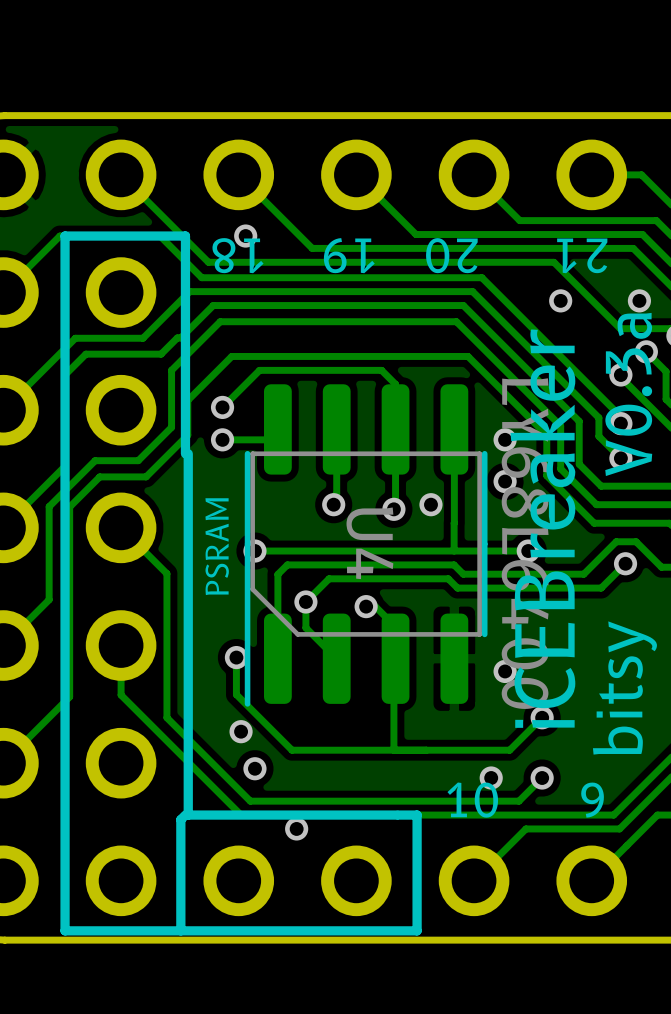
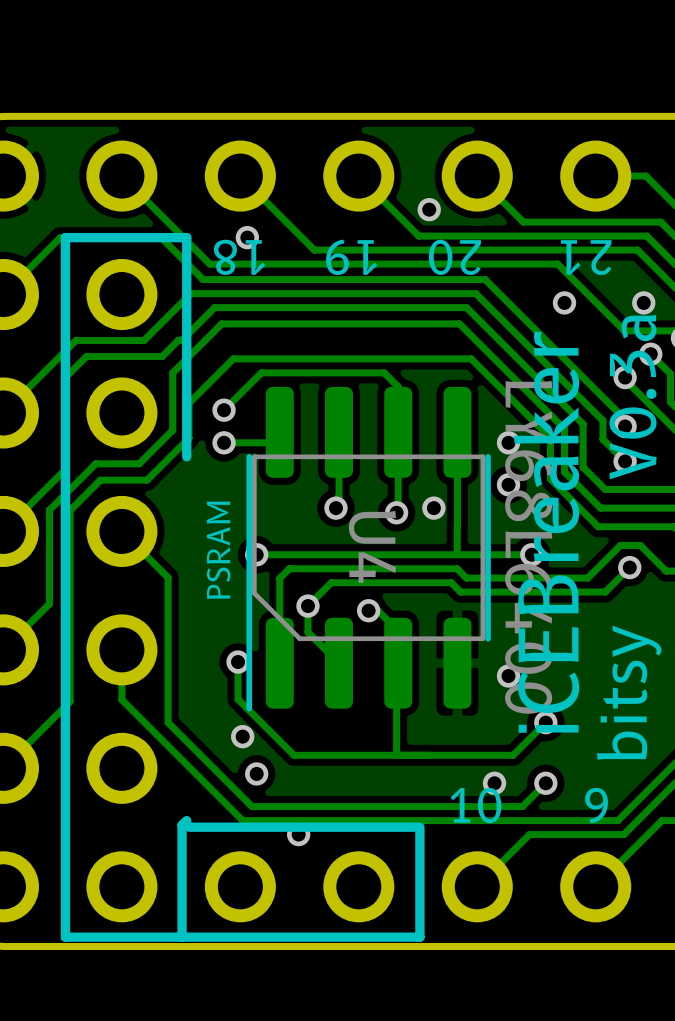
via: none -> (429, 209)
line: (188, 453) (188, 815) (396, 815) -> none
line: (398, 815) (417, 815) (417, 824) -> none
line: none -> (419, 827) (189, 827)

